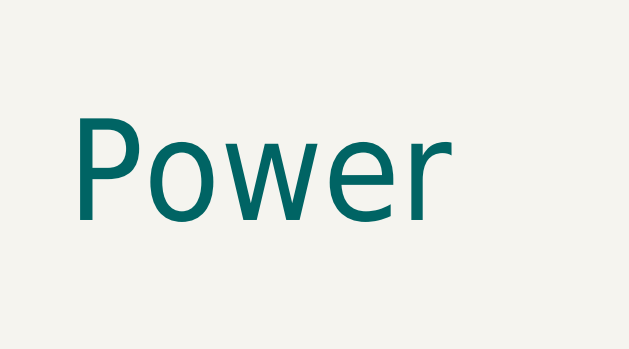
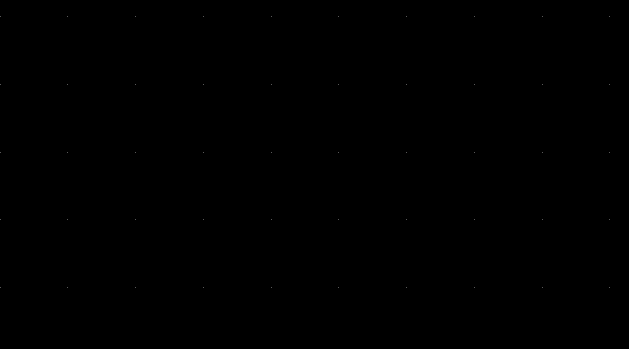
text: Power (265, 170) -> none

